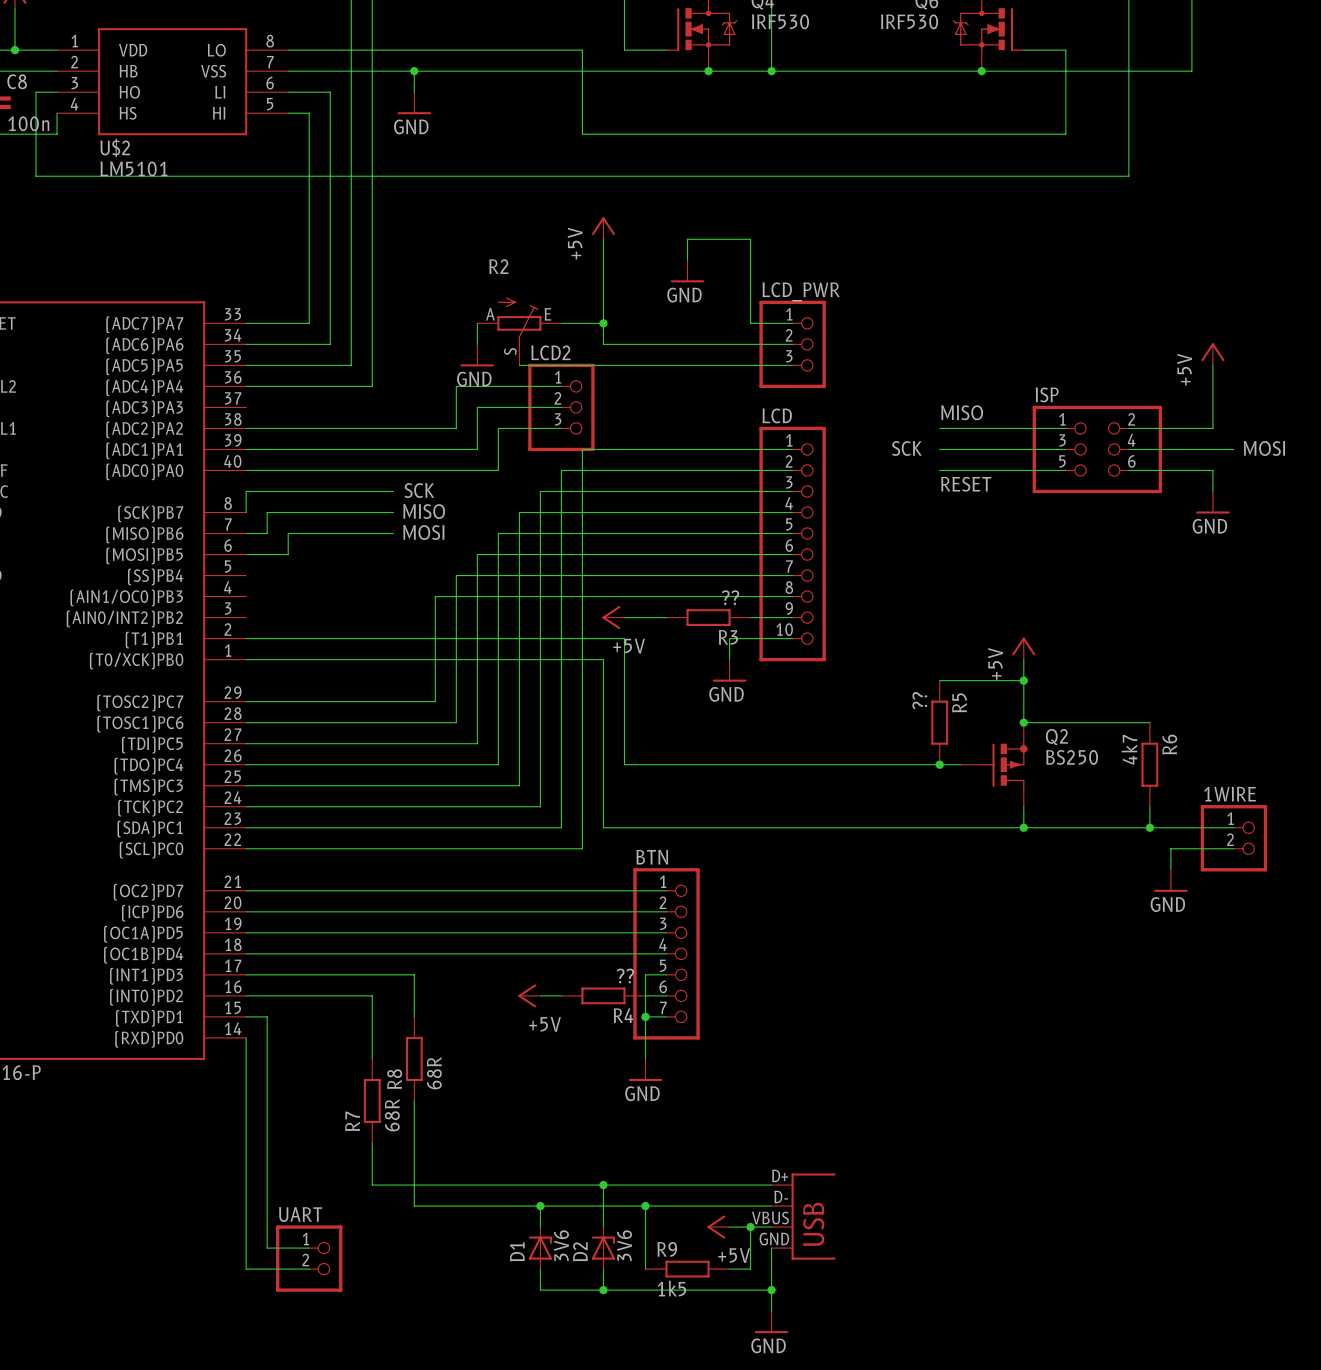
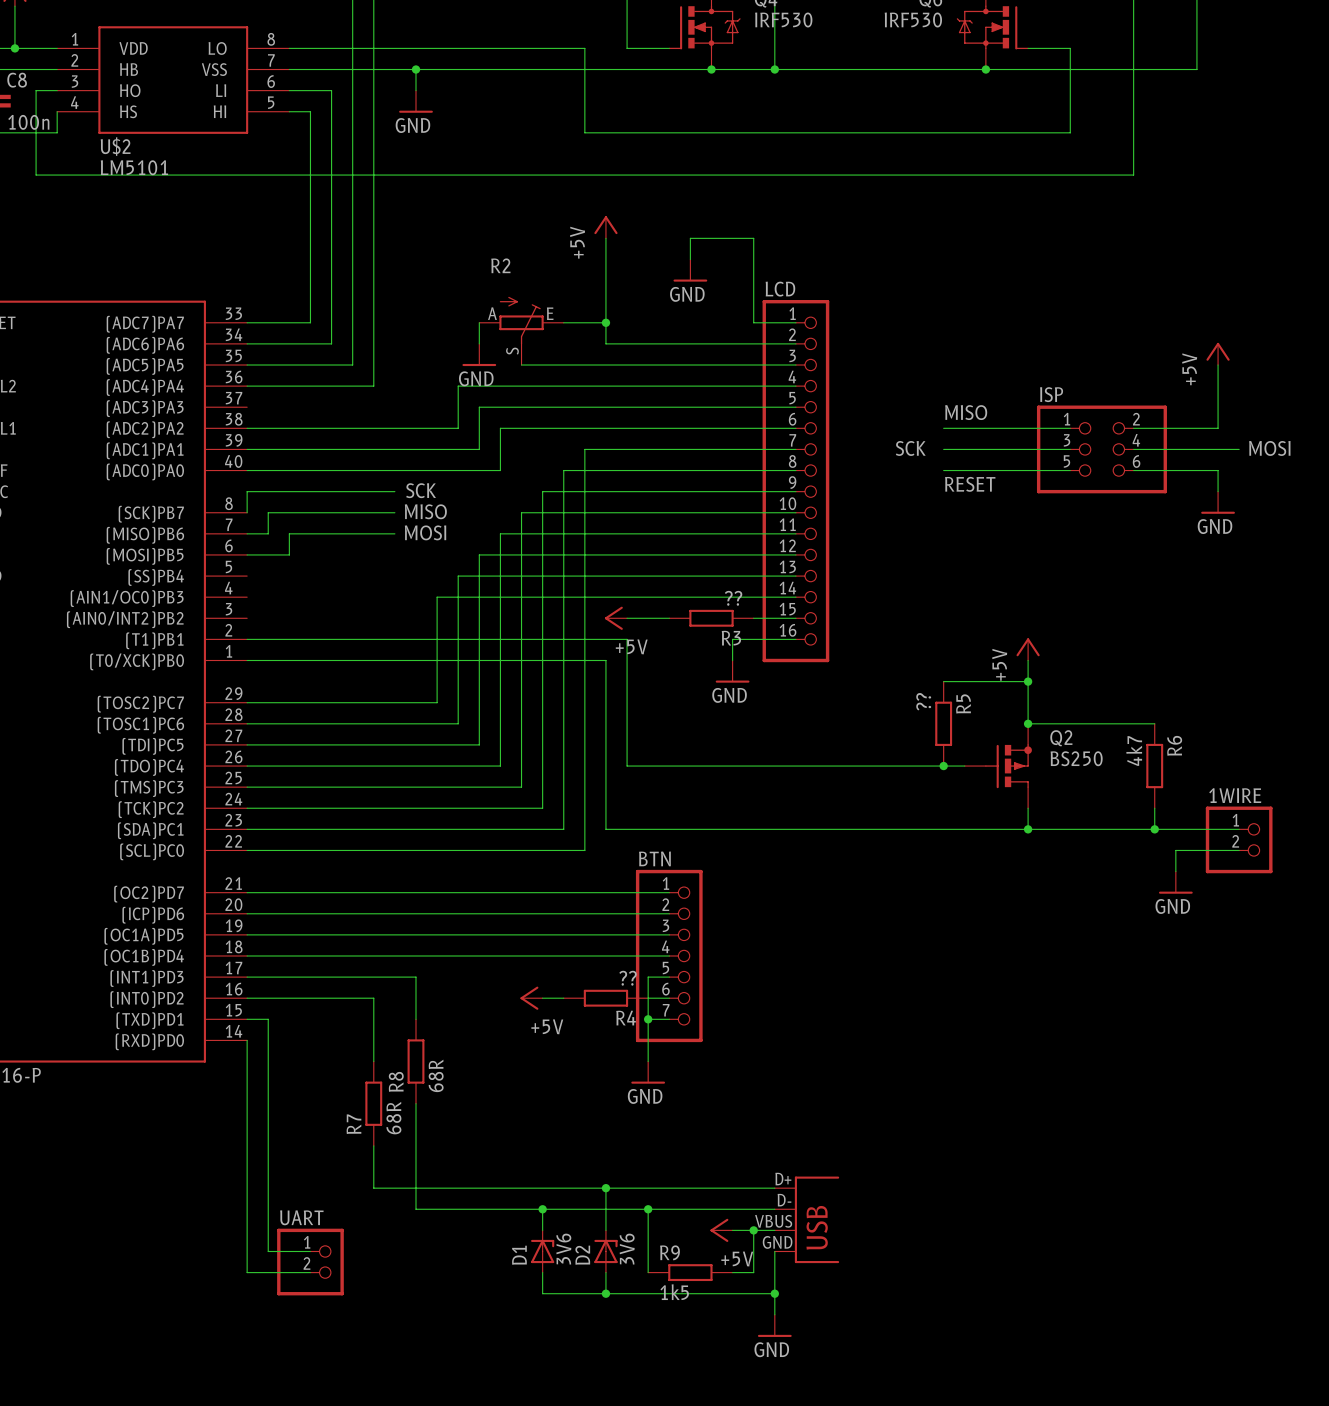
LCD_PWR: (792, 344) -> none
wire: none -> (563, 386) (795, 386)
wire: none -> (563, 407) (795, 407)
LCD2: (561, 407) -> none
wire: none -> (563, 428) (795, 428)
LCD: none -> (795, 481)
LCD: (792, 544) -> none

